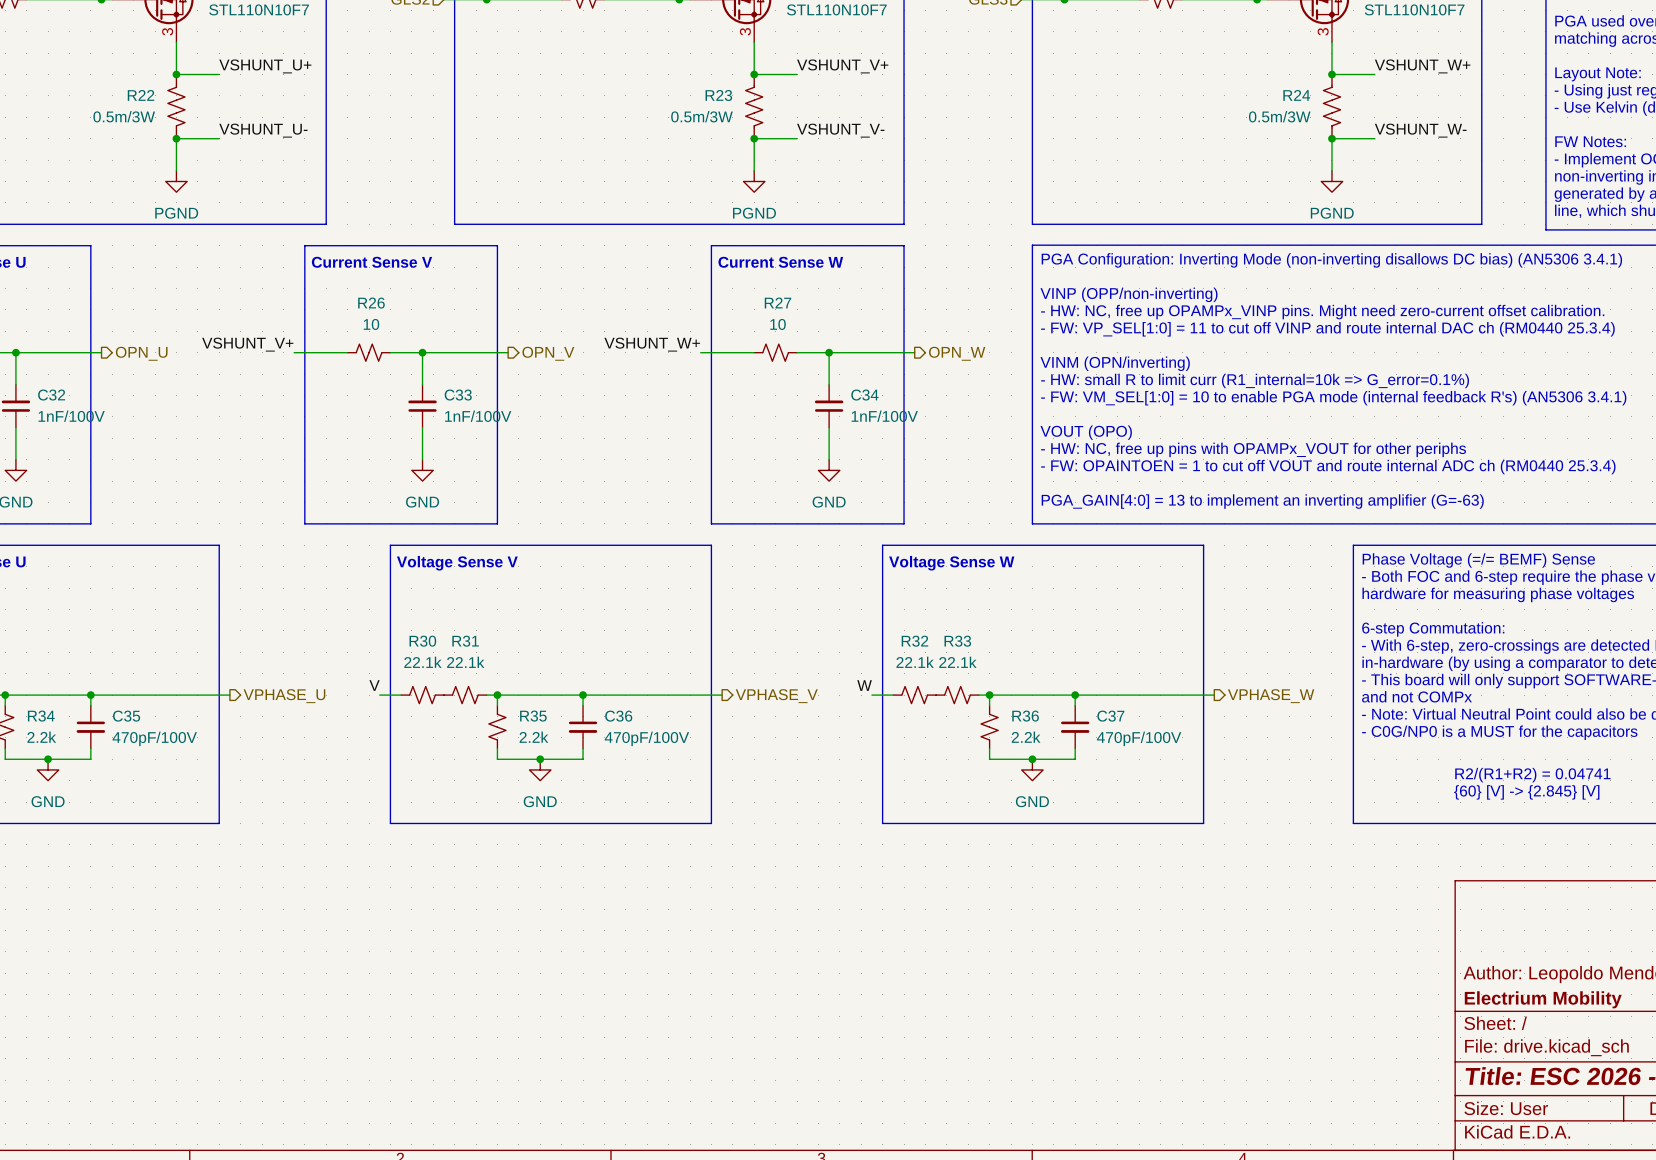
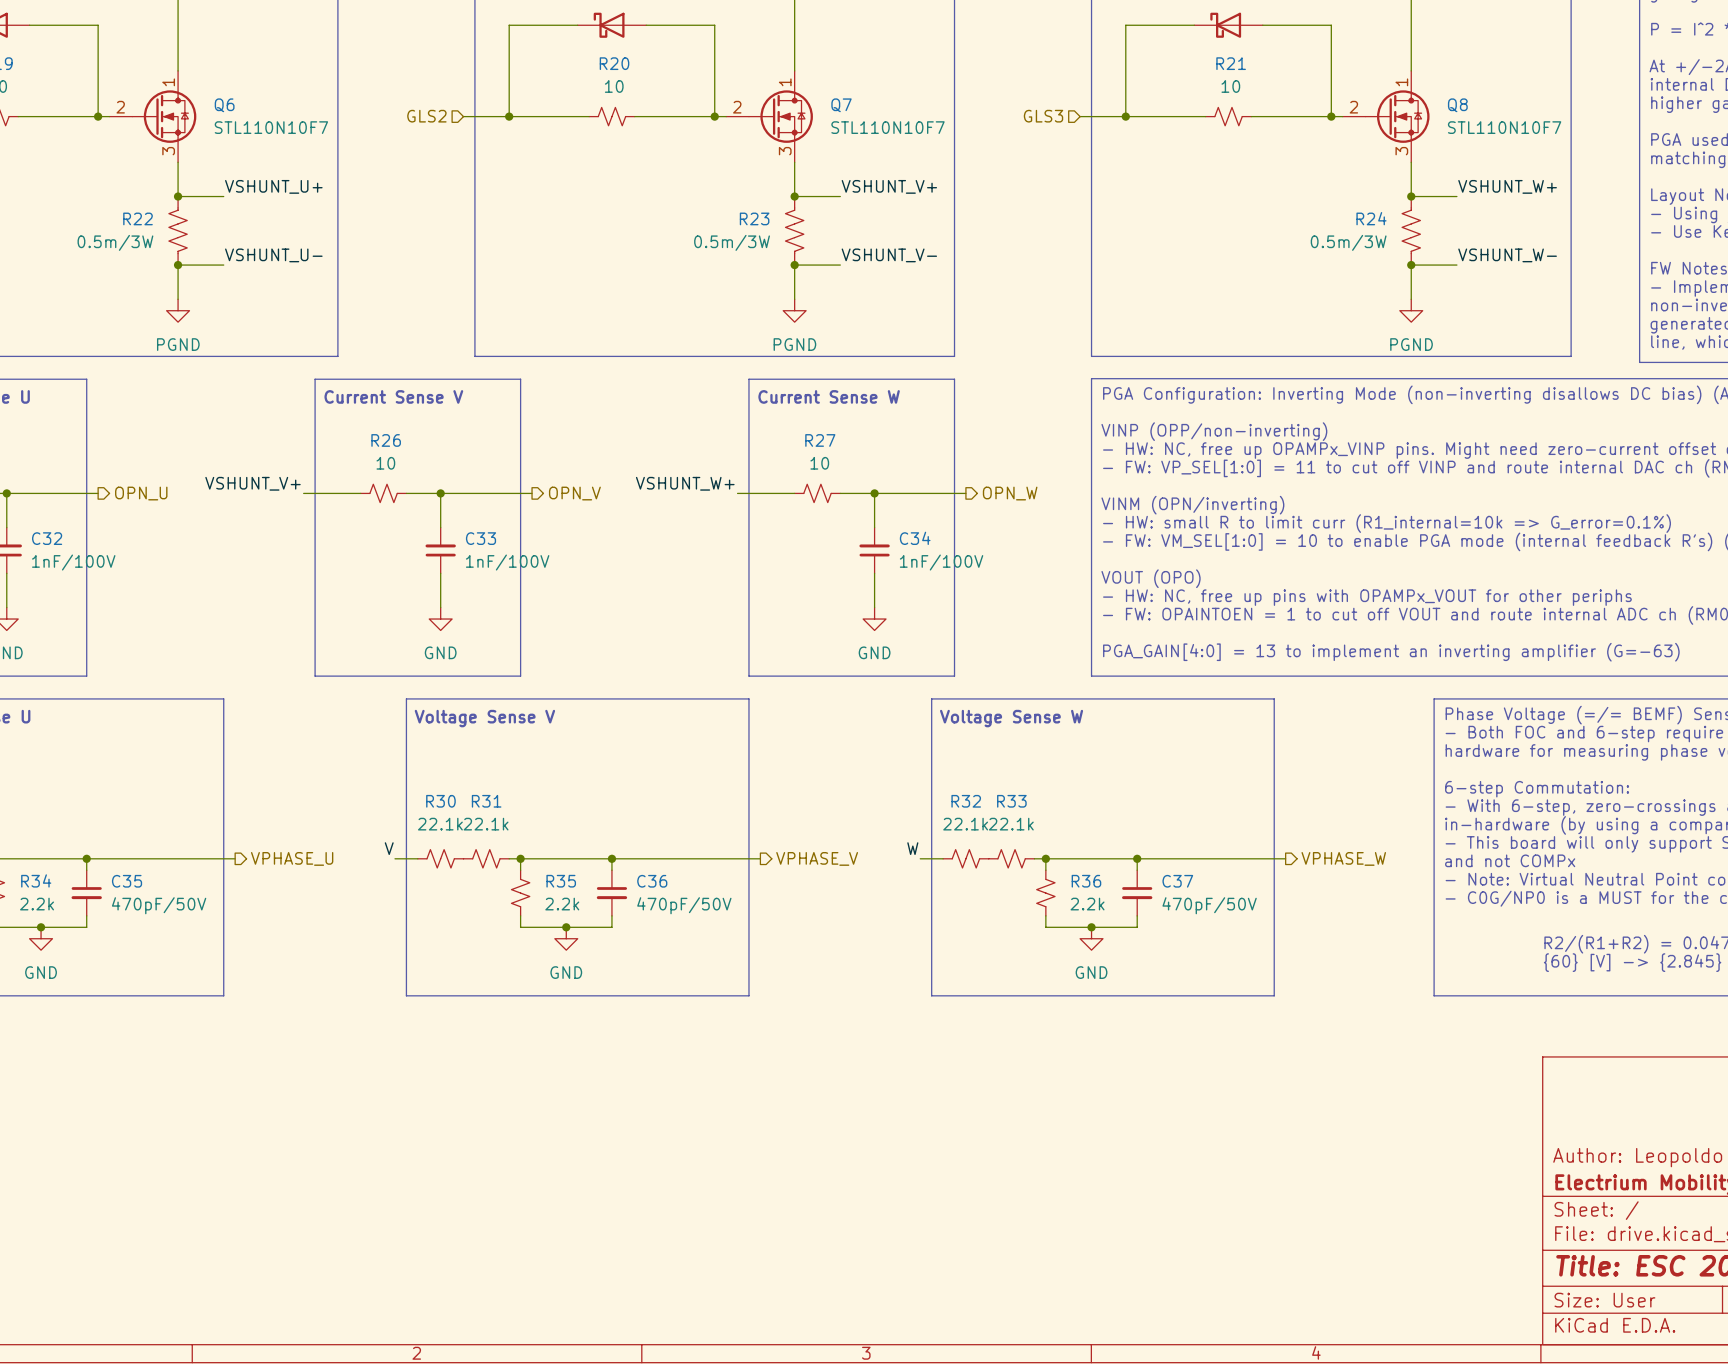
C35 value: 470pF/100V (154, 738) -> 470pF/50V (159, 905)
C36 value: 470pF/100V (646, 738) -> 470pF/50V (684, 905)
C37 value: 470pF/100V (1139, 738) -> 470pF/50V (1209, 905)

